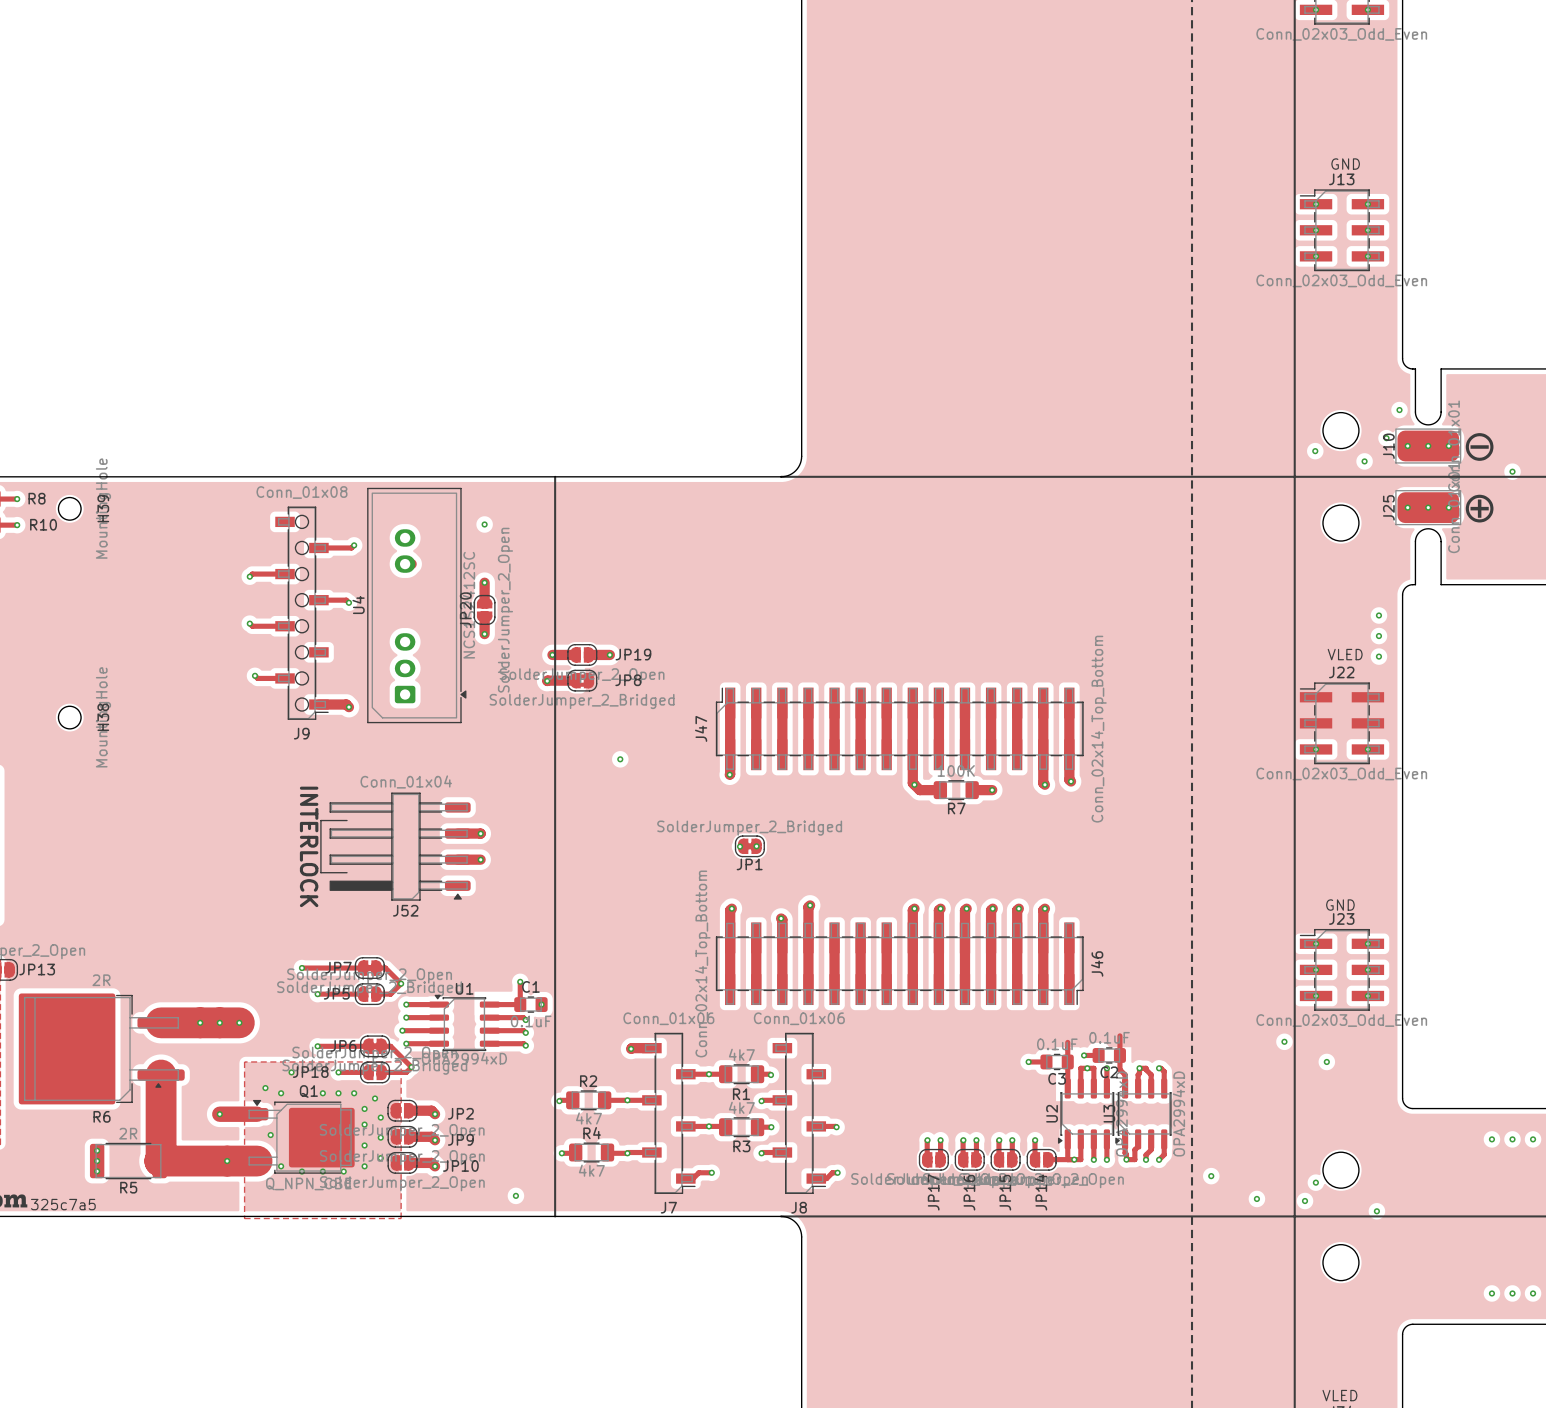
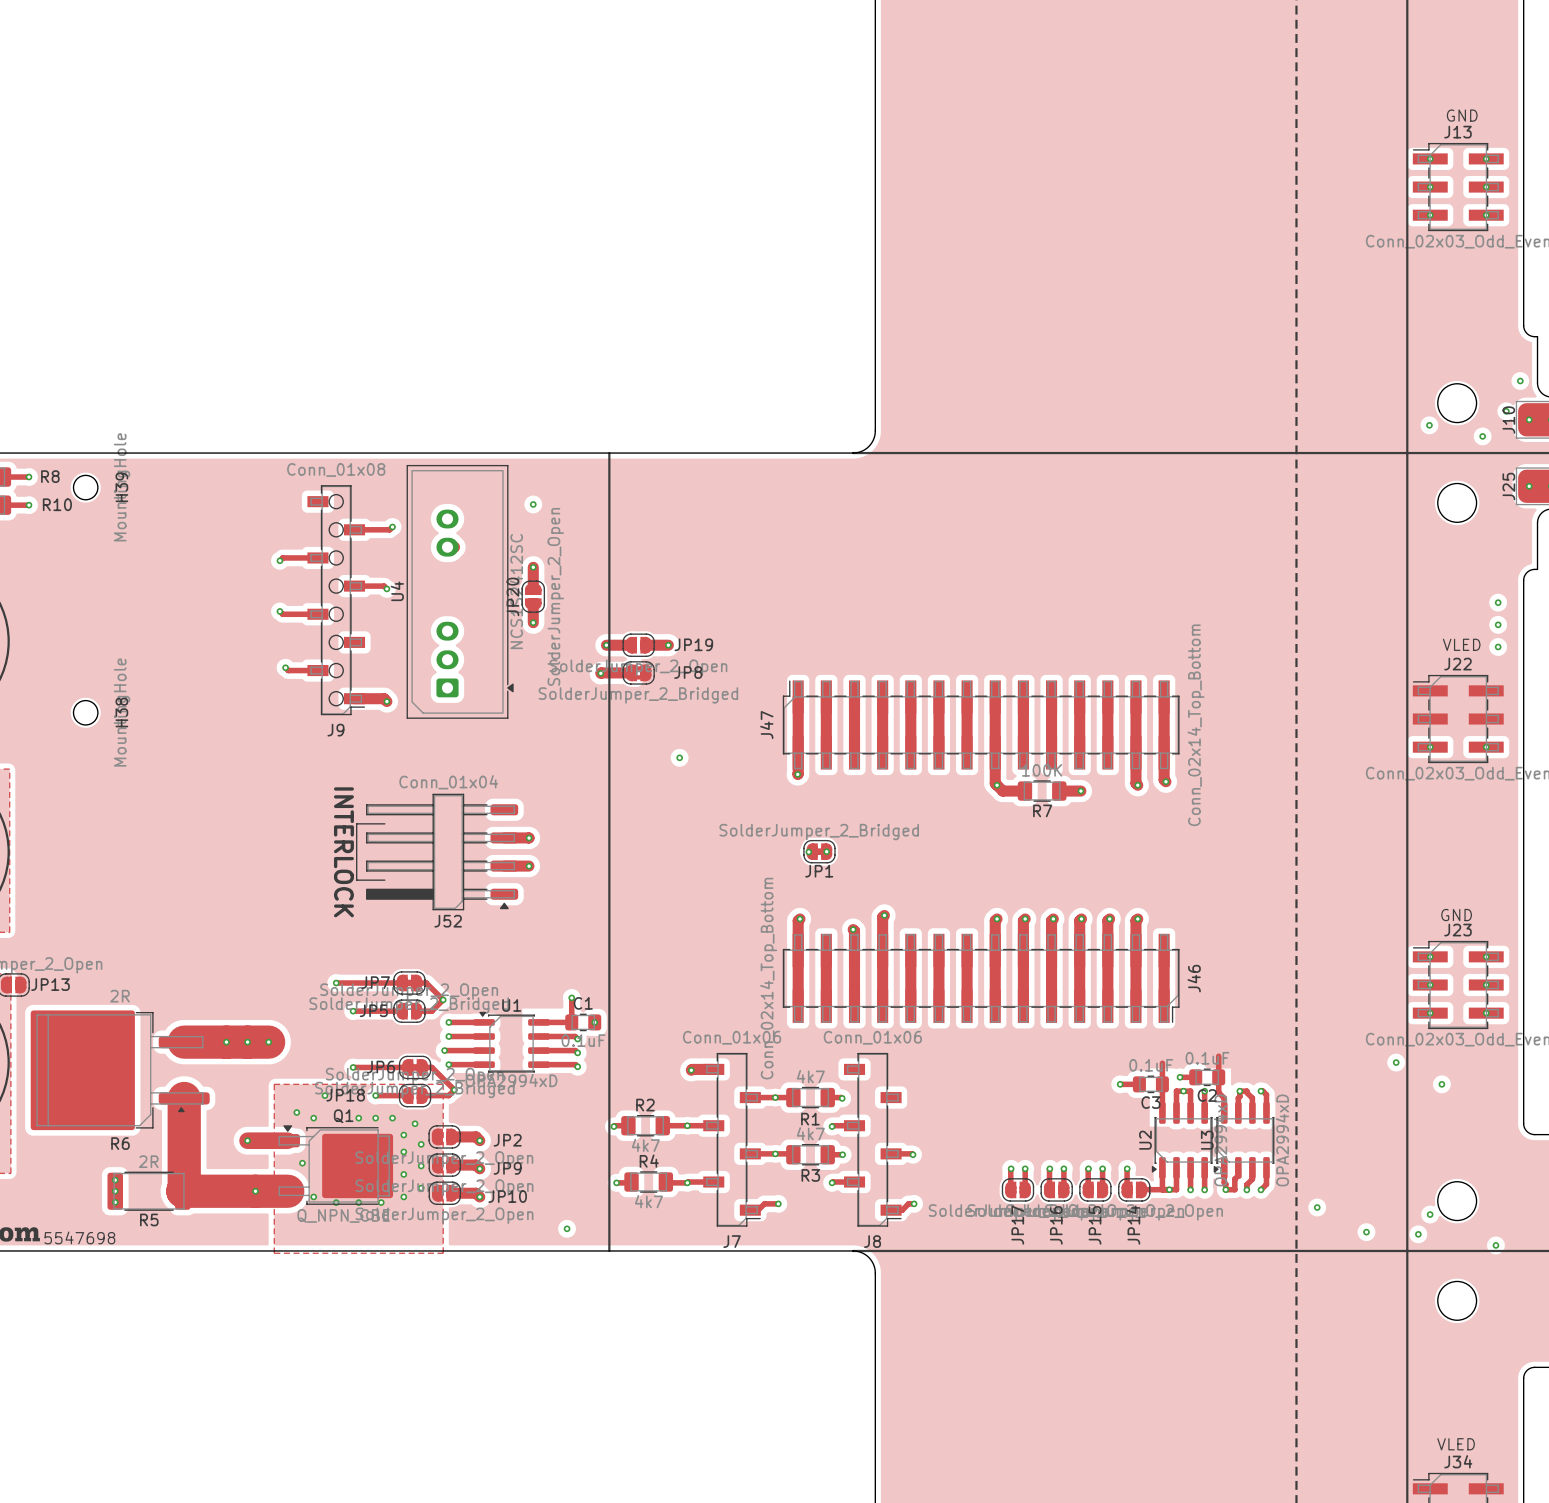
text: 325c7a5 (63, 1204) -> 5547698 (79, 1237)

